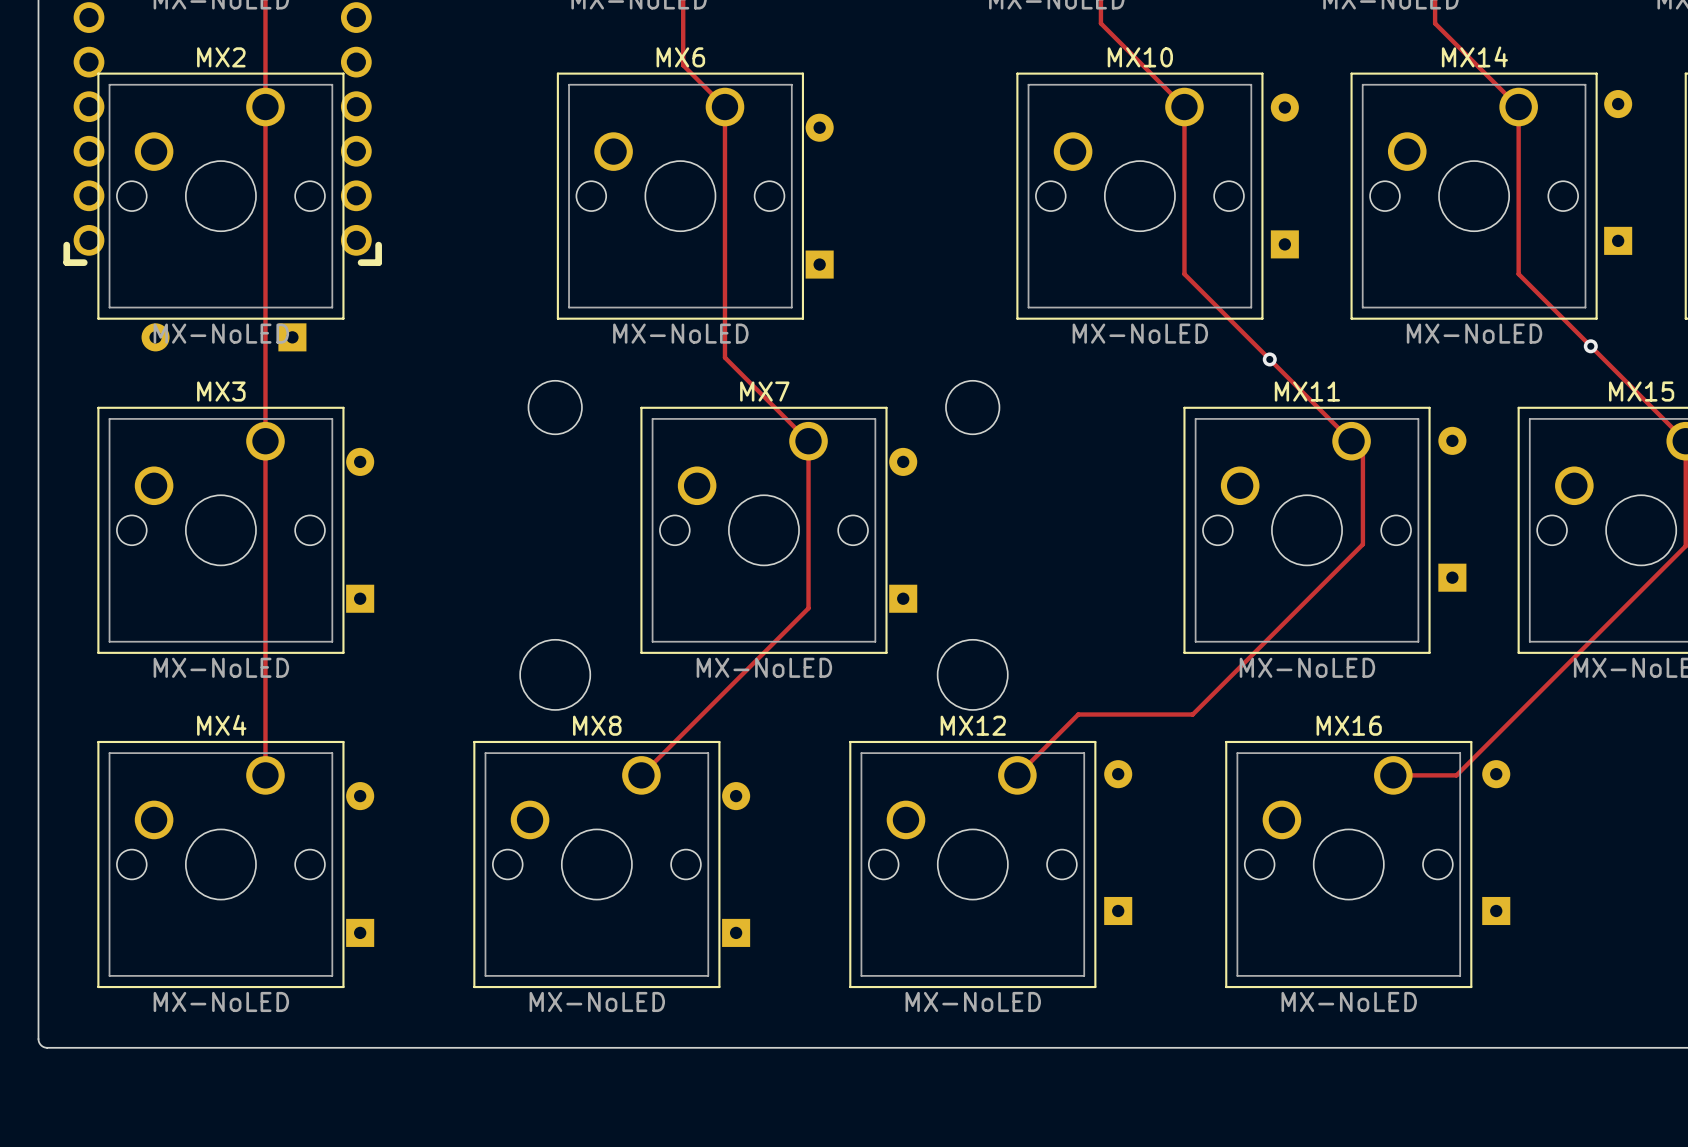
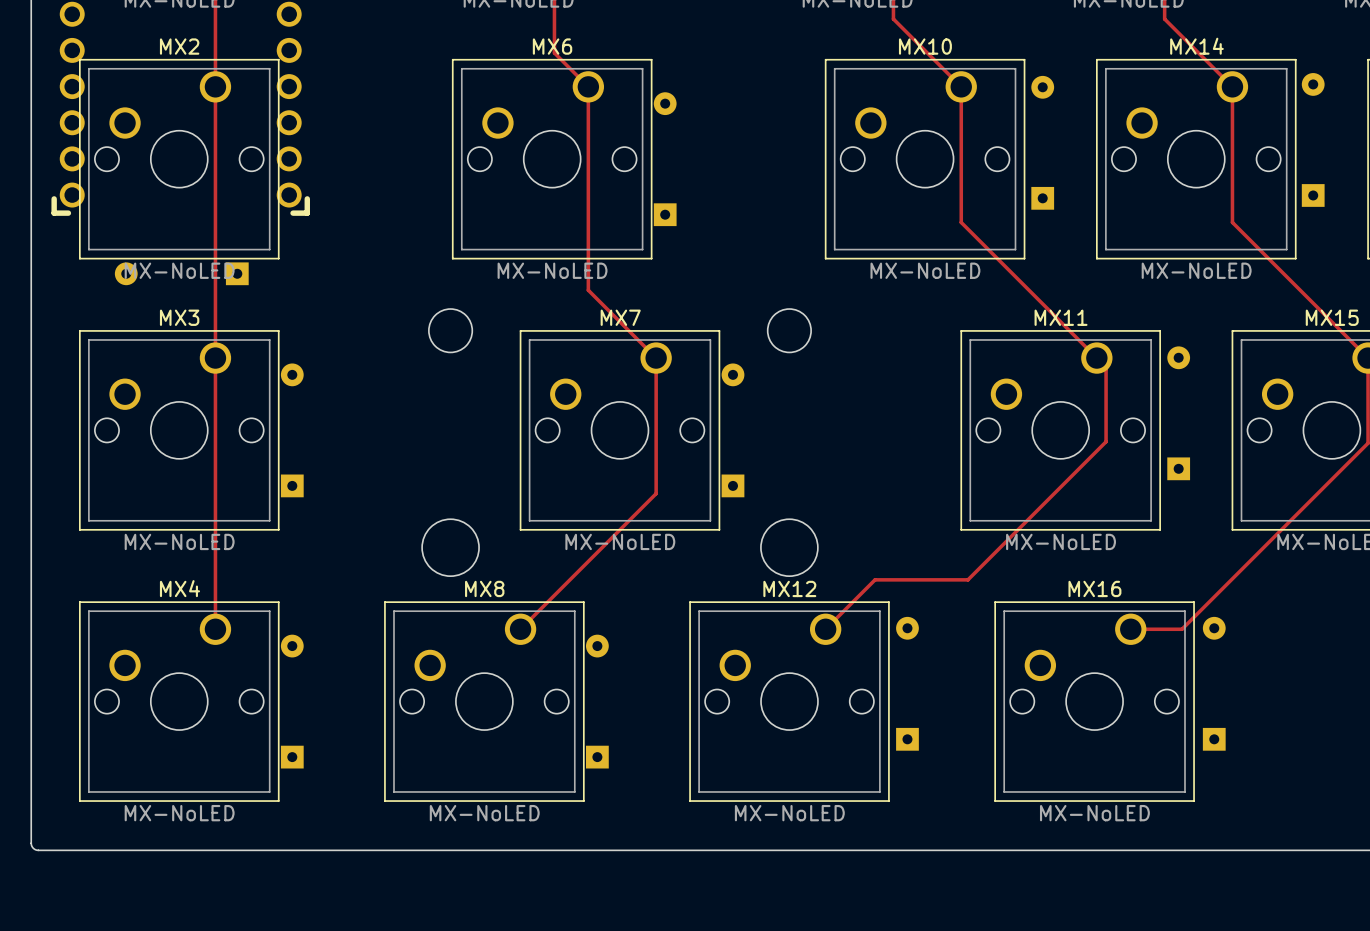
via: (1590, 346) -> none
via: (1269, 359) -> none

